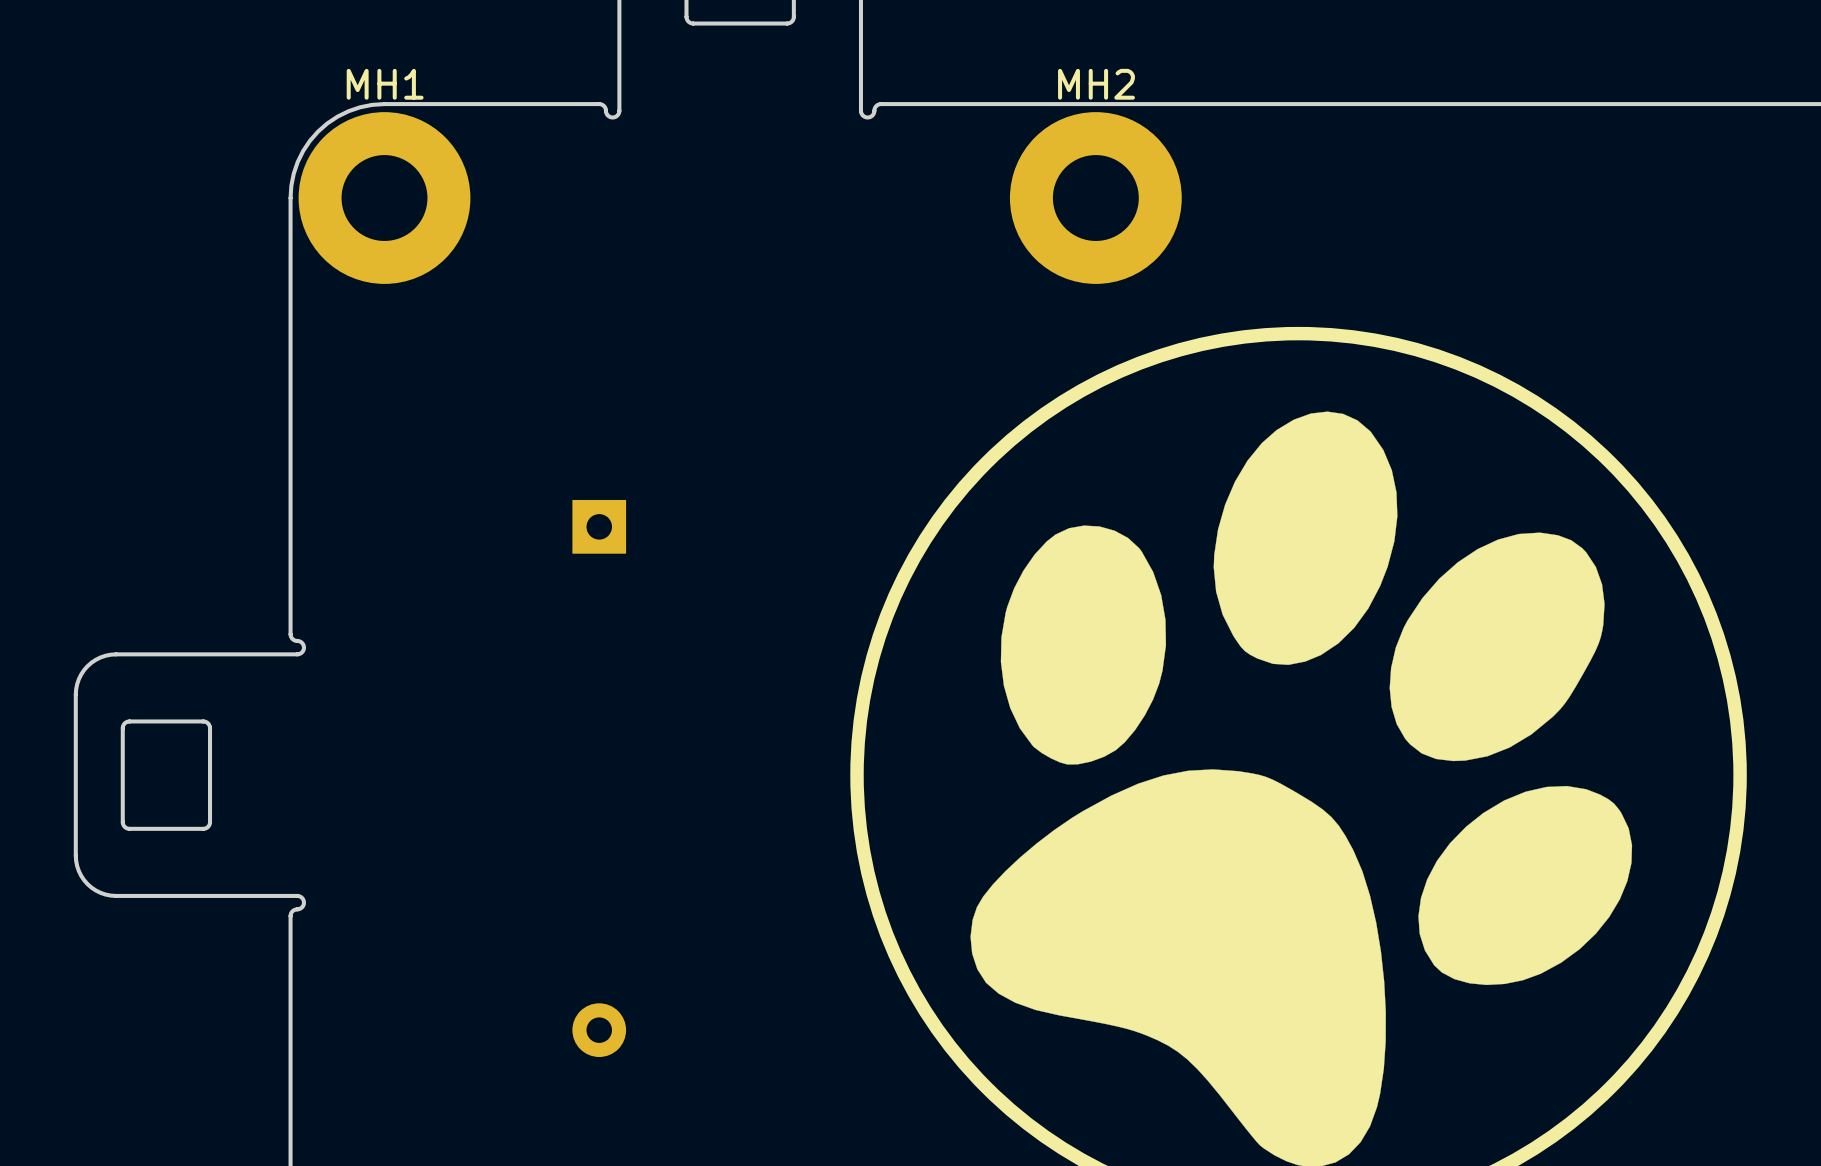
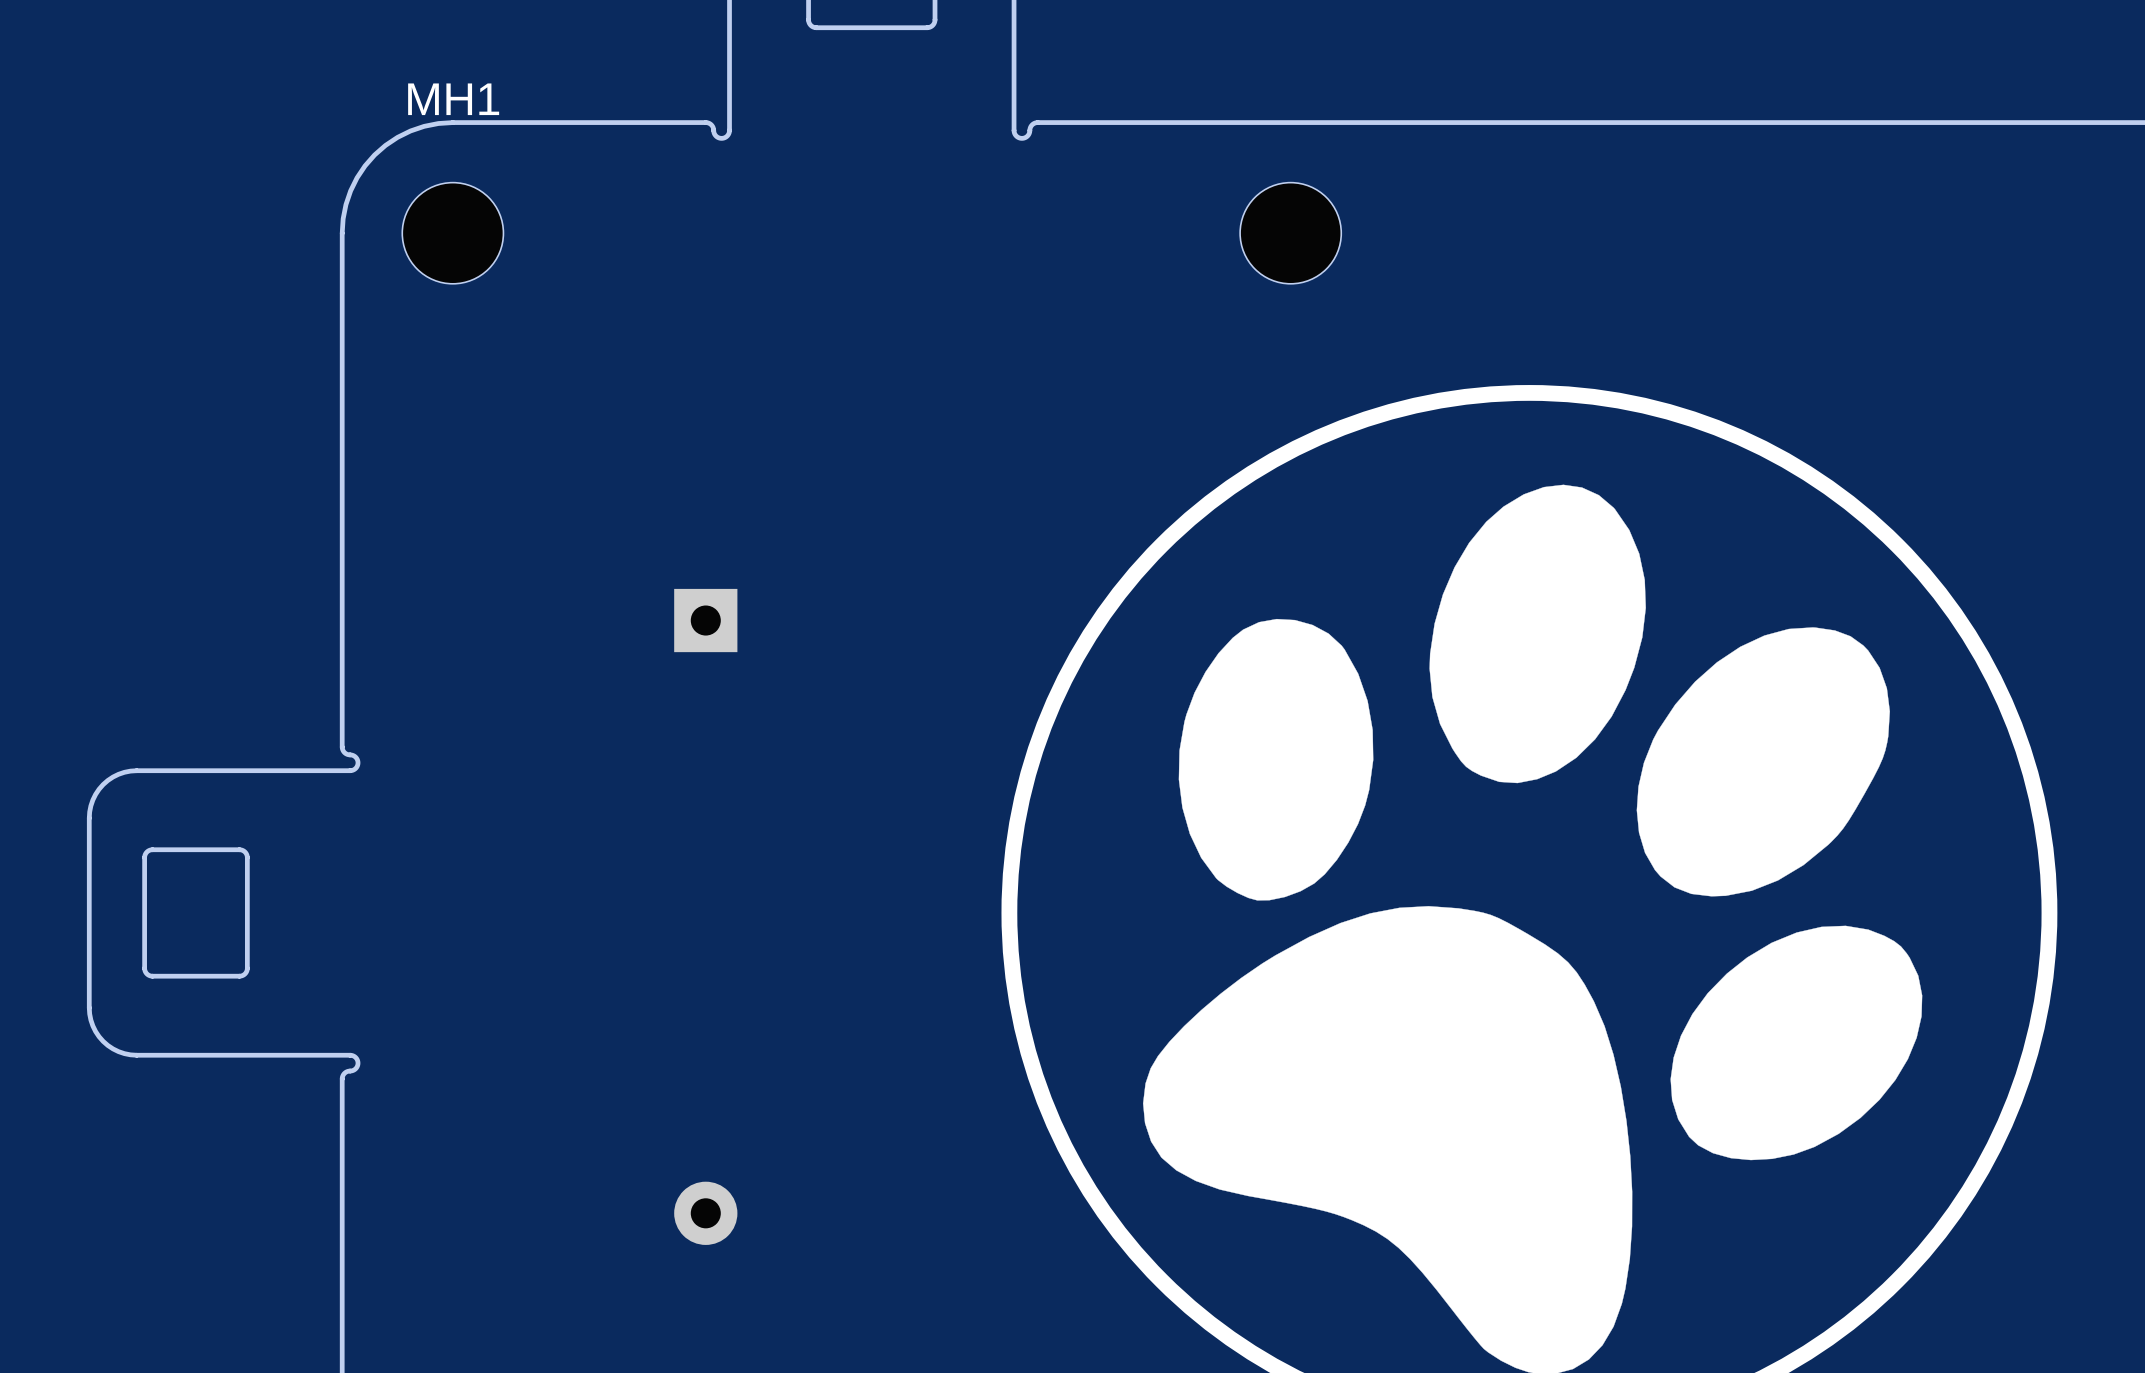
MH1 footprint: [298, 112, 471, 284] -> [402, 182, 504, 284]
MH2: (1095, 198) -> none
part: none -> (1290, 233)

